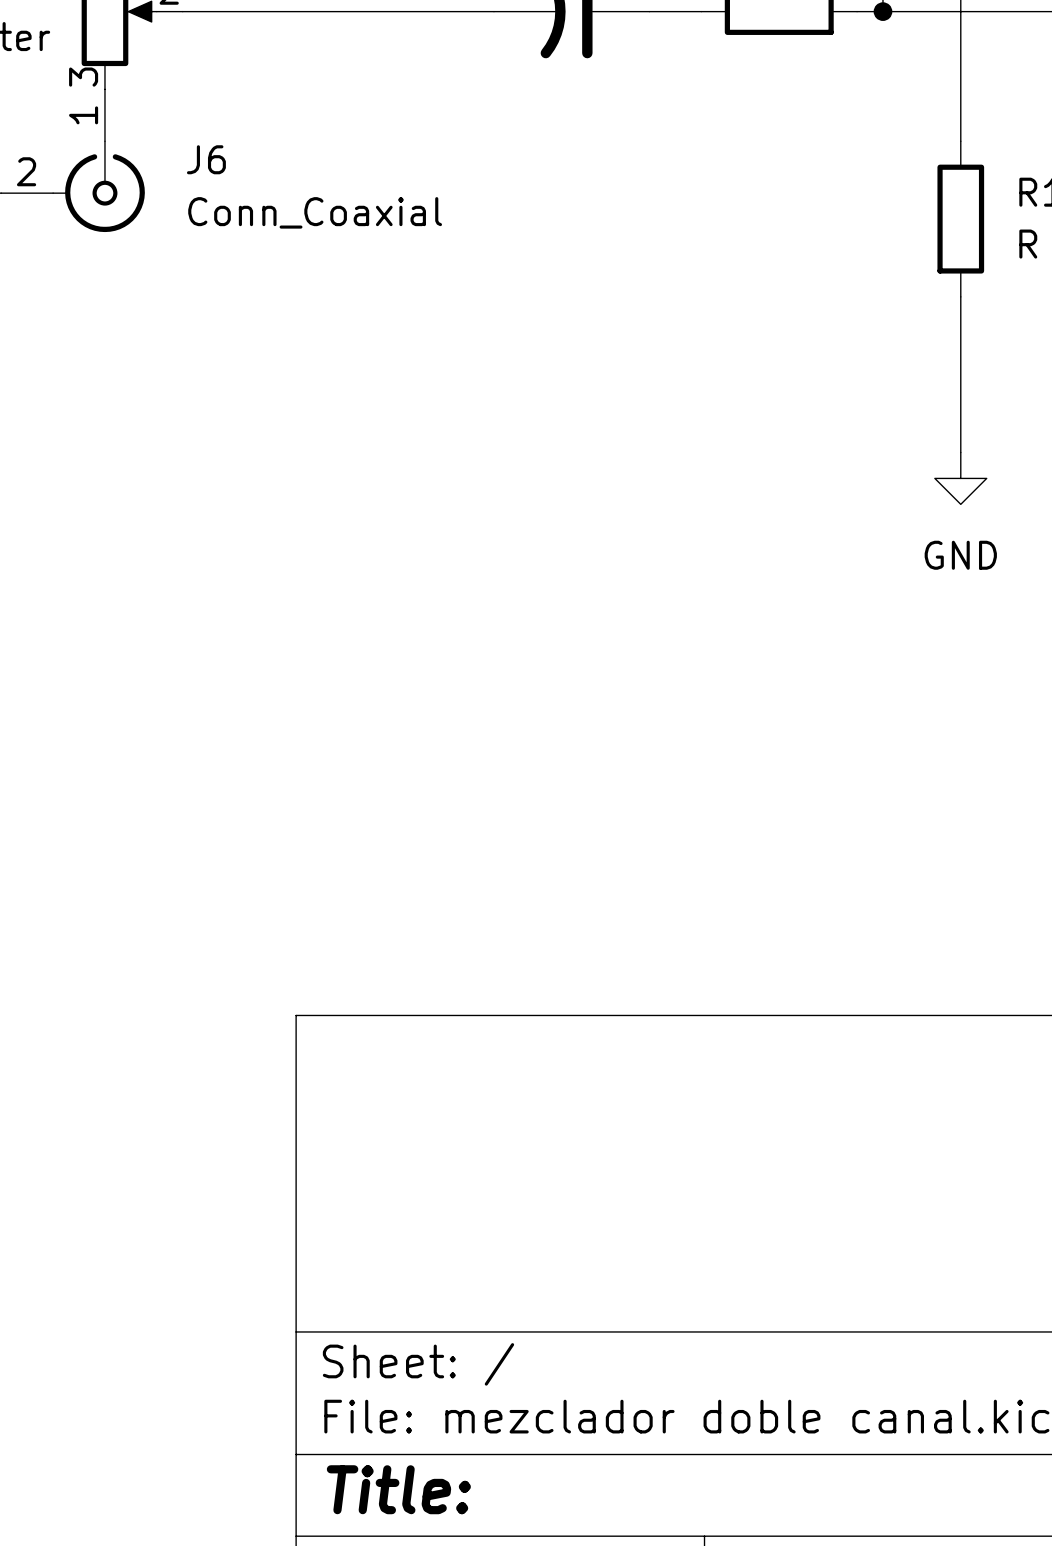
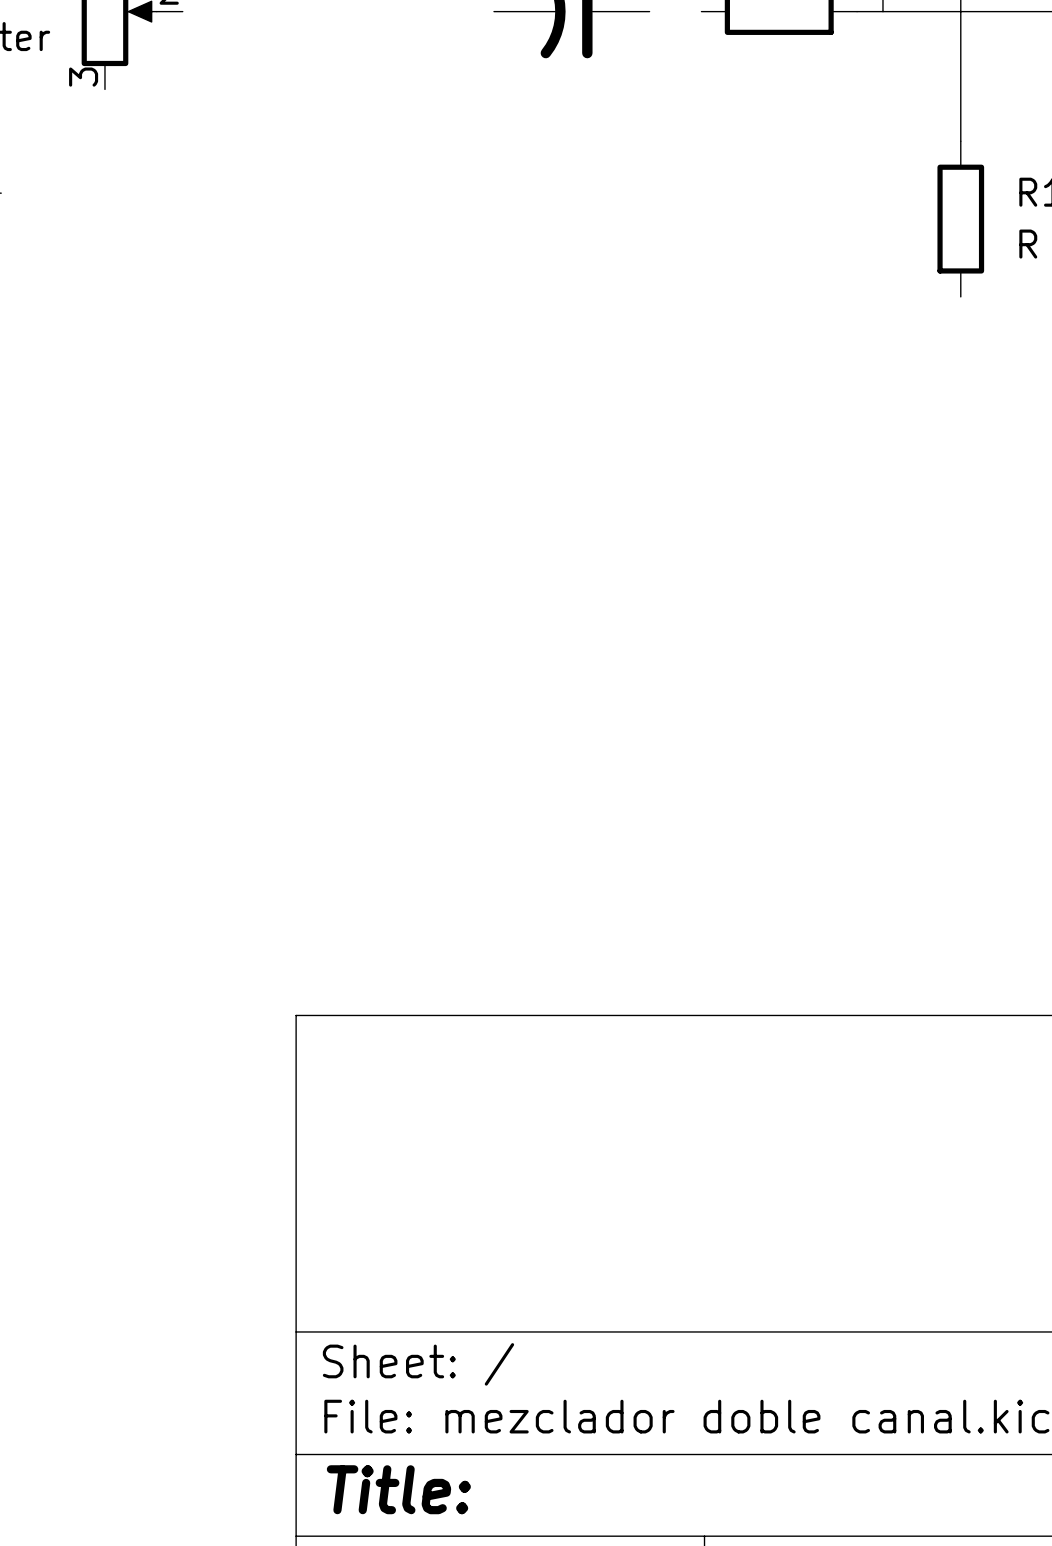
wire: (182, 11) (493, 11) -> none
wire: (649, 11) (701, 11) -> none
junction: (882, 11) -> none
J6: Conn_Coaxial (73, 160) -> none
wire: (960, 296) (960, 452) -> none
power symbol: GND (960, 478) -> none

